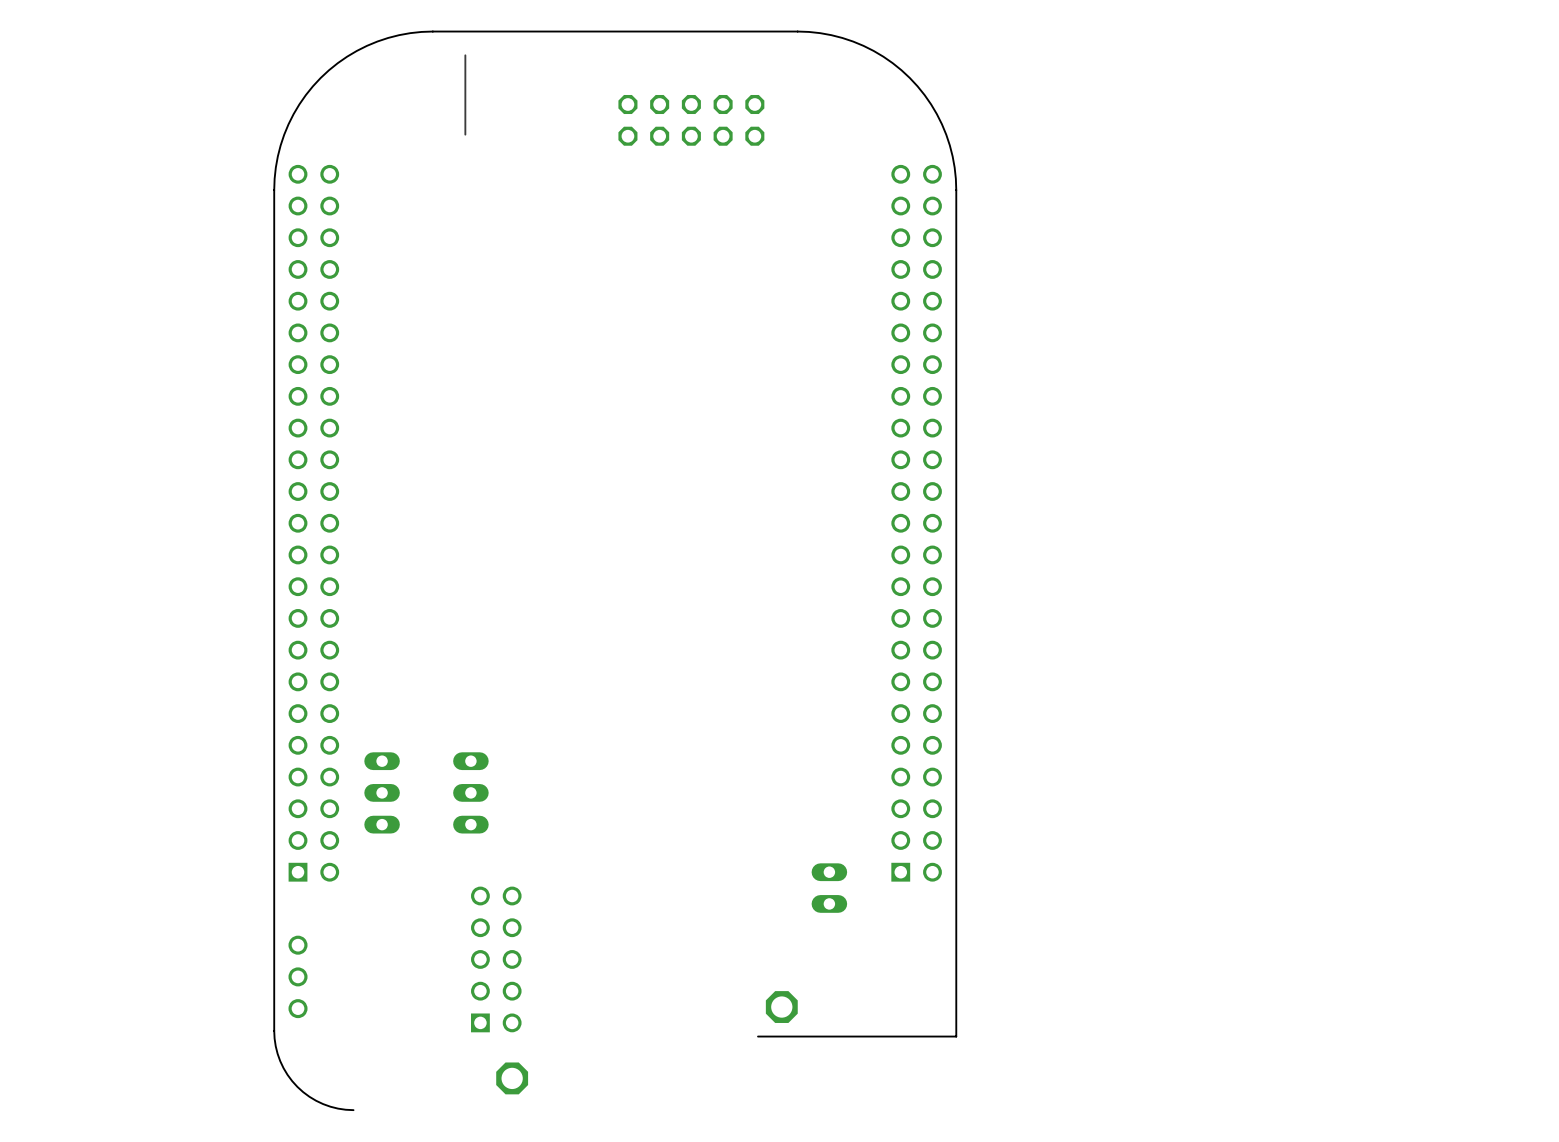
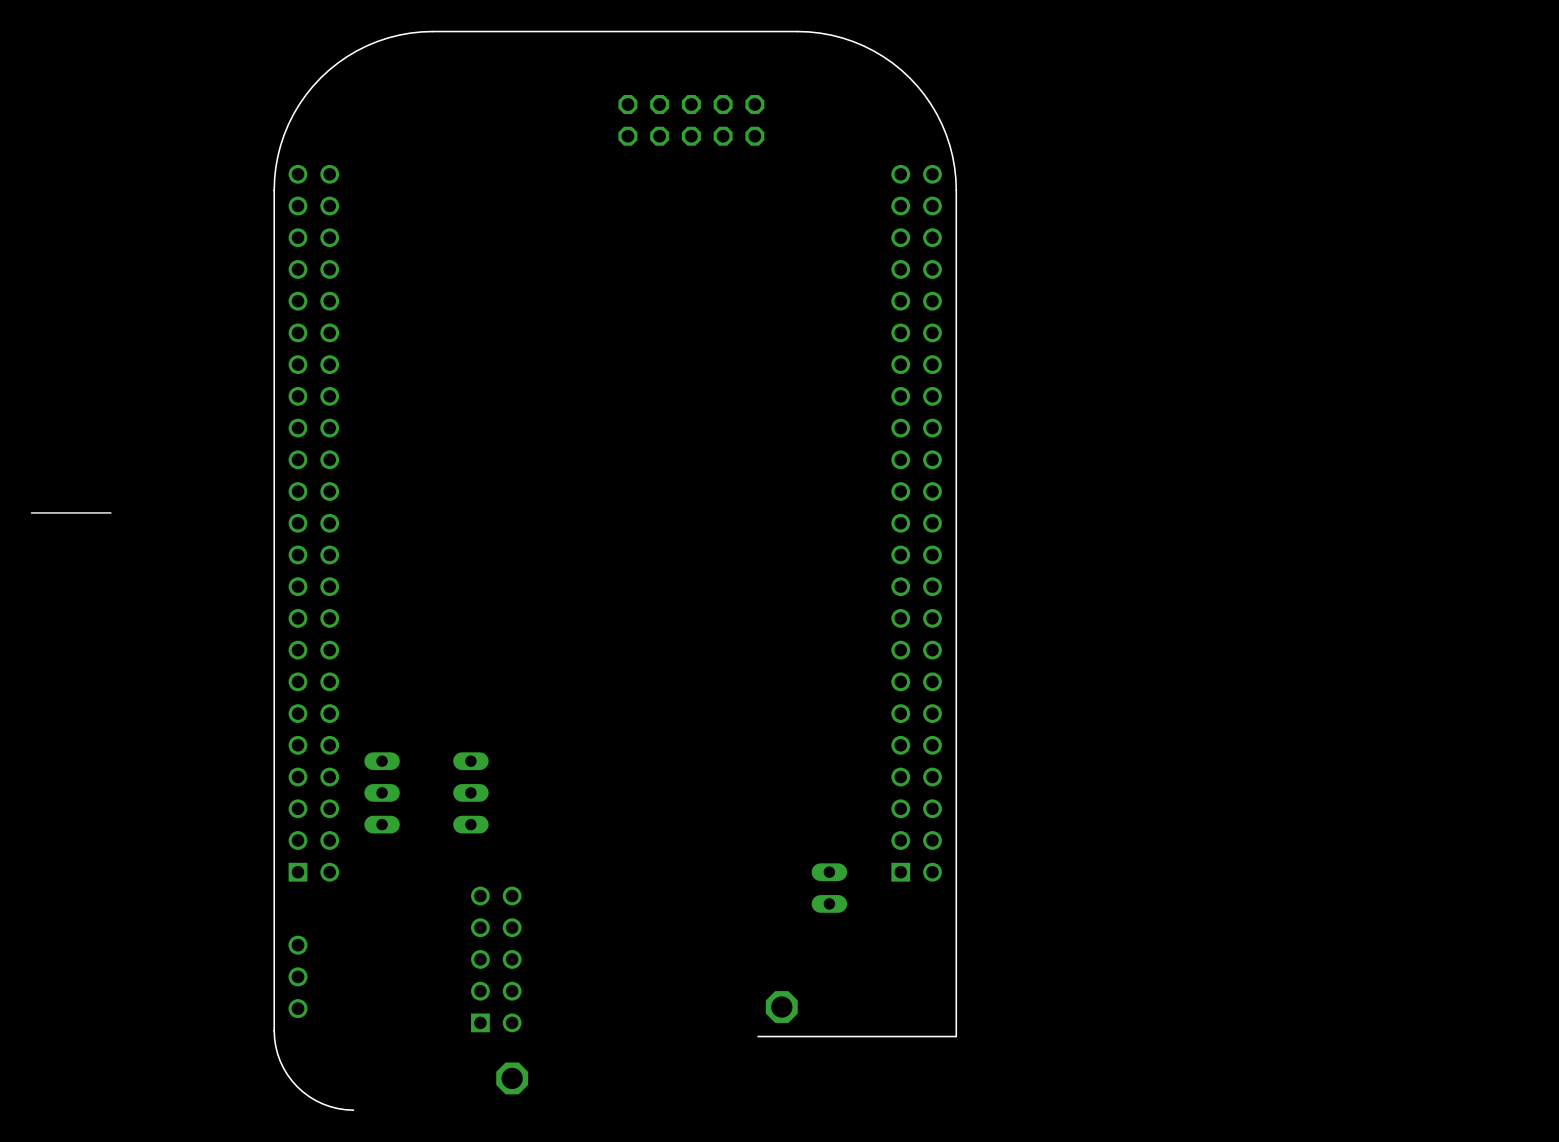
part: (465, 94) -> none
part: none -> (71, 512)

